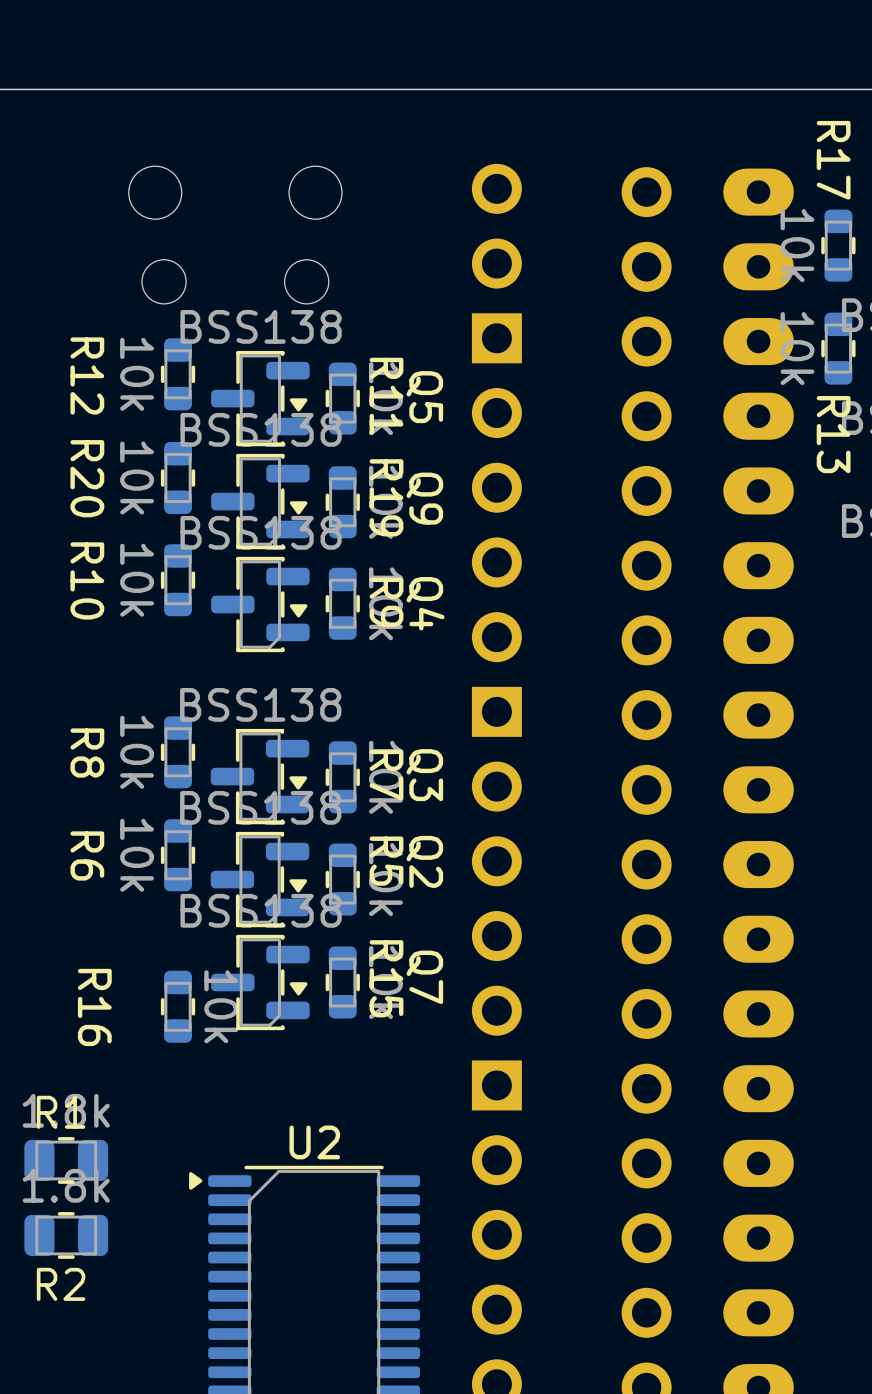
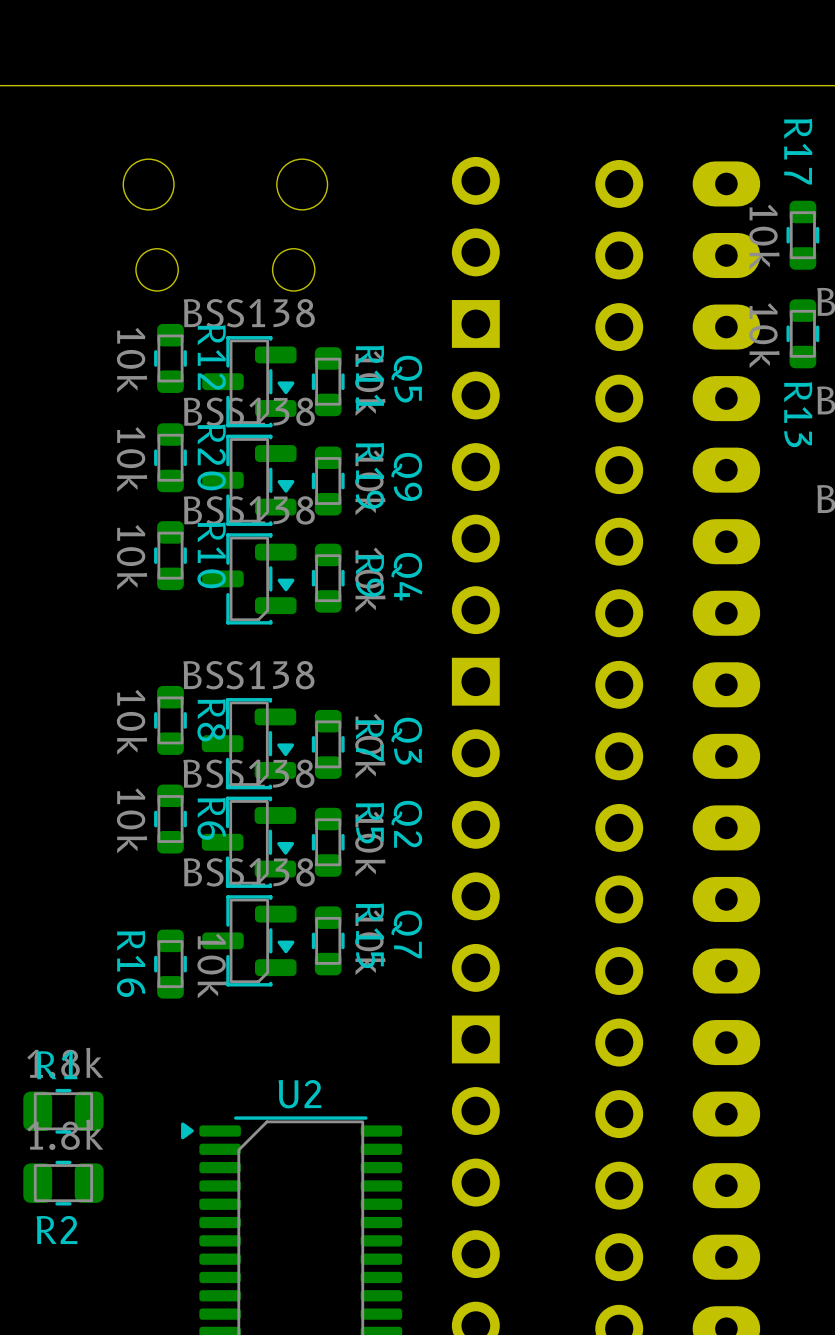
R12 name position: R12 (87, 375) -> R12 (211, 357)
R20 name position: R20 (87, 478) -> R20 (211, 457)
R10 name position: R10 (87, 580) -> R10 (211, 555)
R8 name position: R8 (87, 753) -> R8 (211, 720)
R6 name position: R6 (87, 855) -> R6 (211, 818)
R16 name position: R16 (94, 1007) -> R16 (131, 963)

